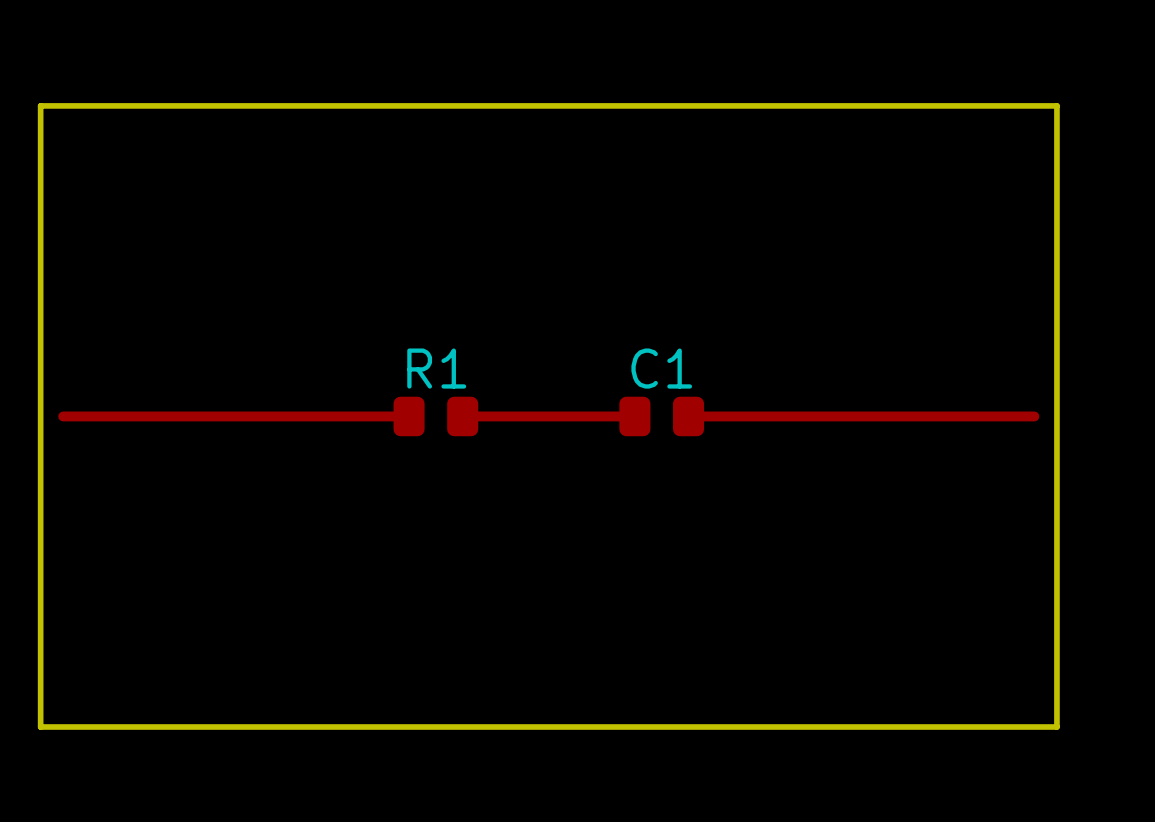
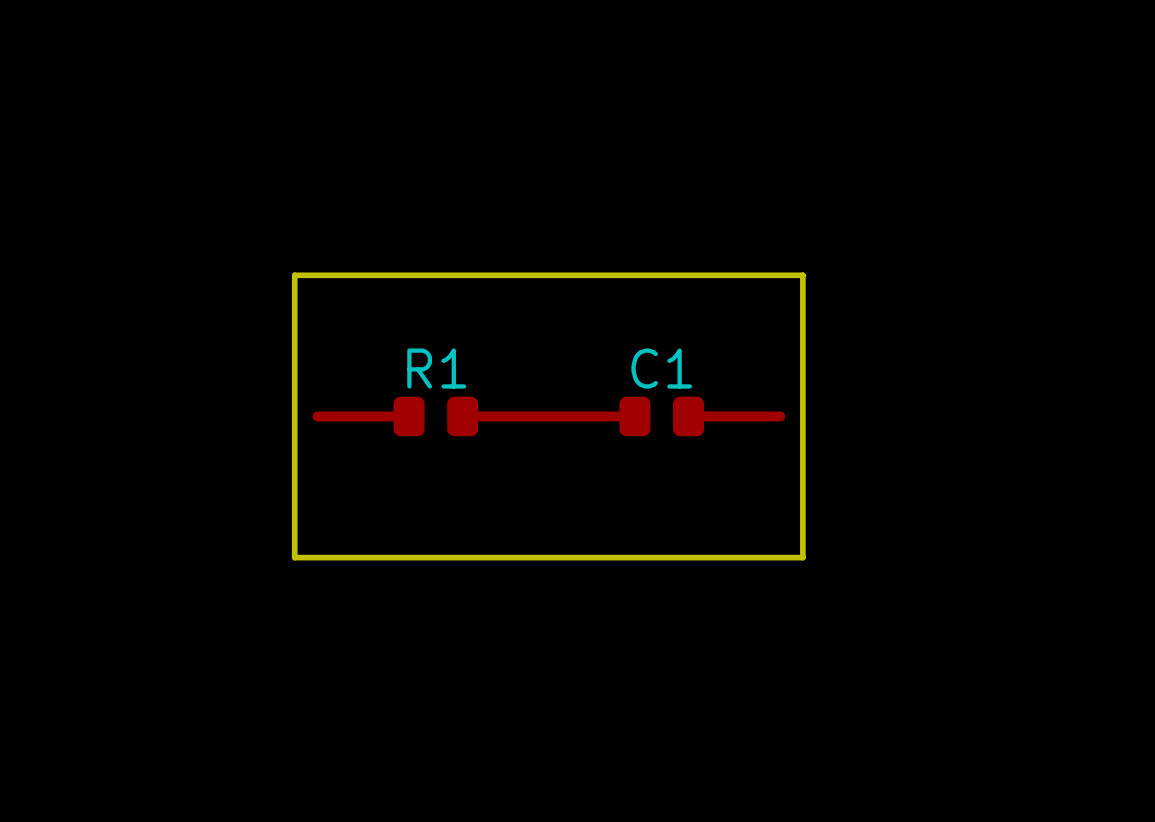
board edge: (40, 105) (1056, 105) (1056, 727) (40, 727) (40, 105) -> none
board edge: none -> (294, 275) (802, 275) (802, 557) (294, 557) (294, 275)
track: (63, 416) (317, 416) -> none
track: (780, 416) (1034, 416) -> none

